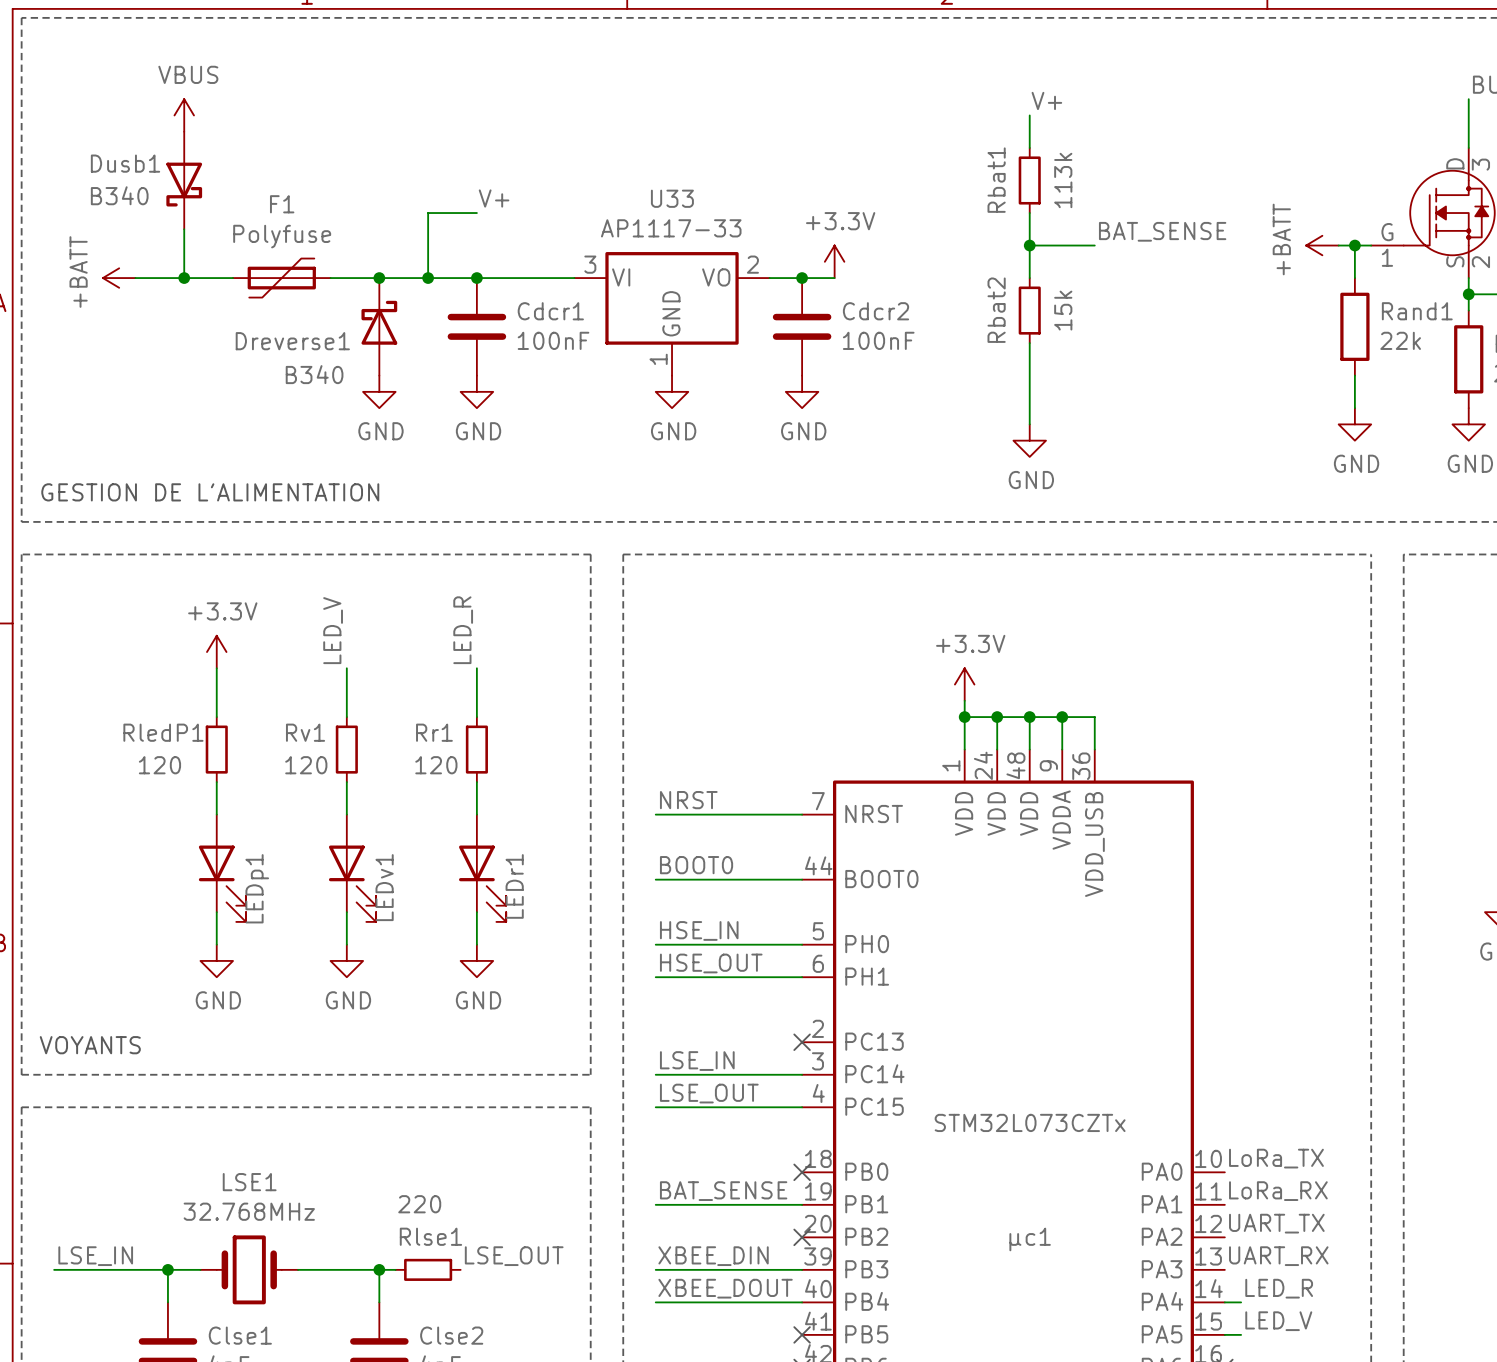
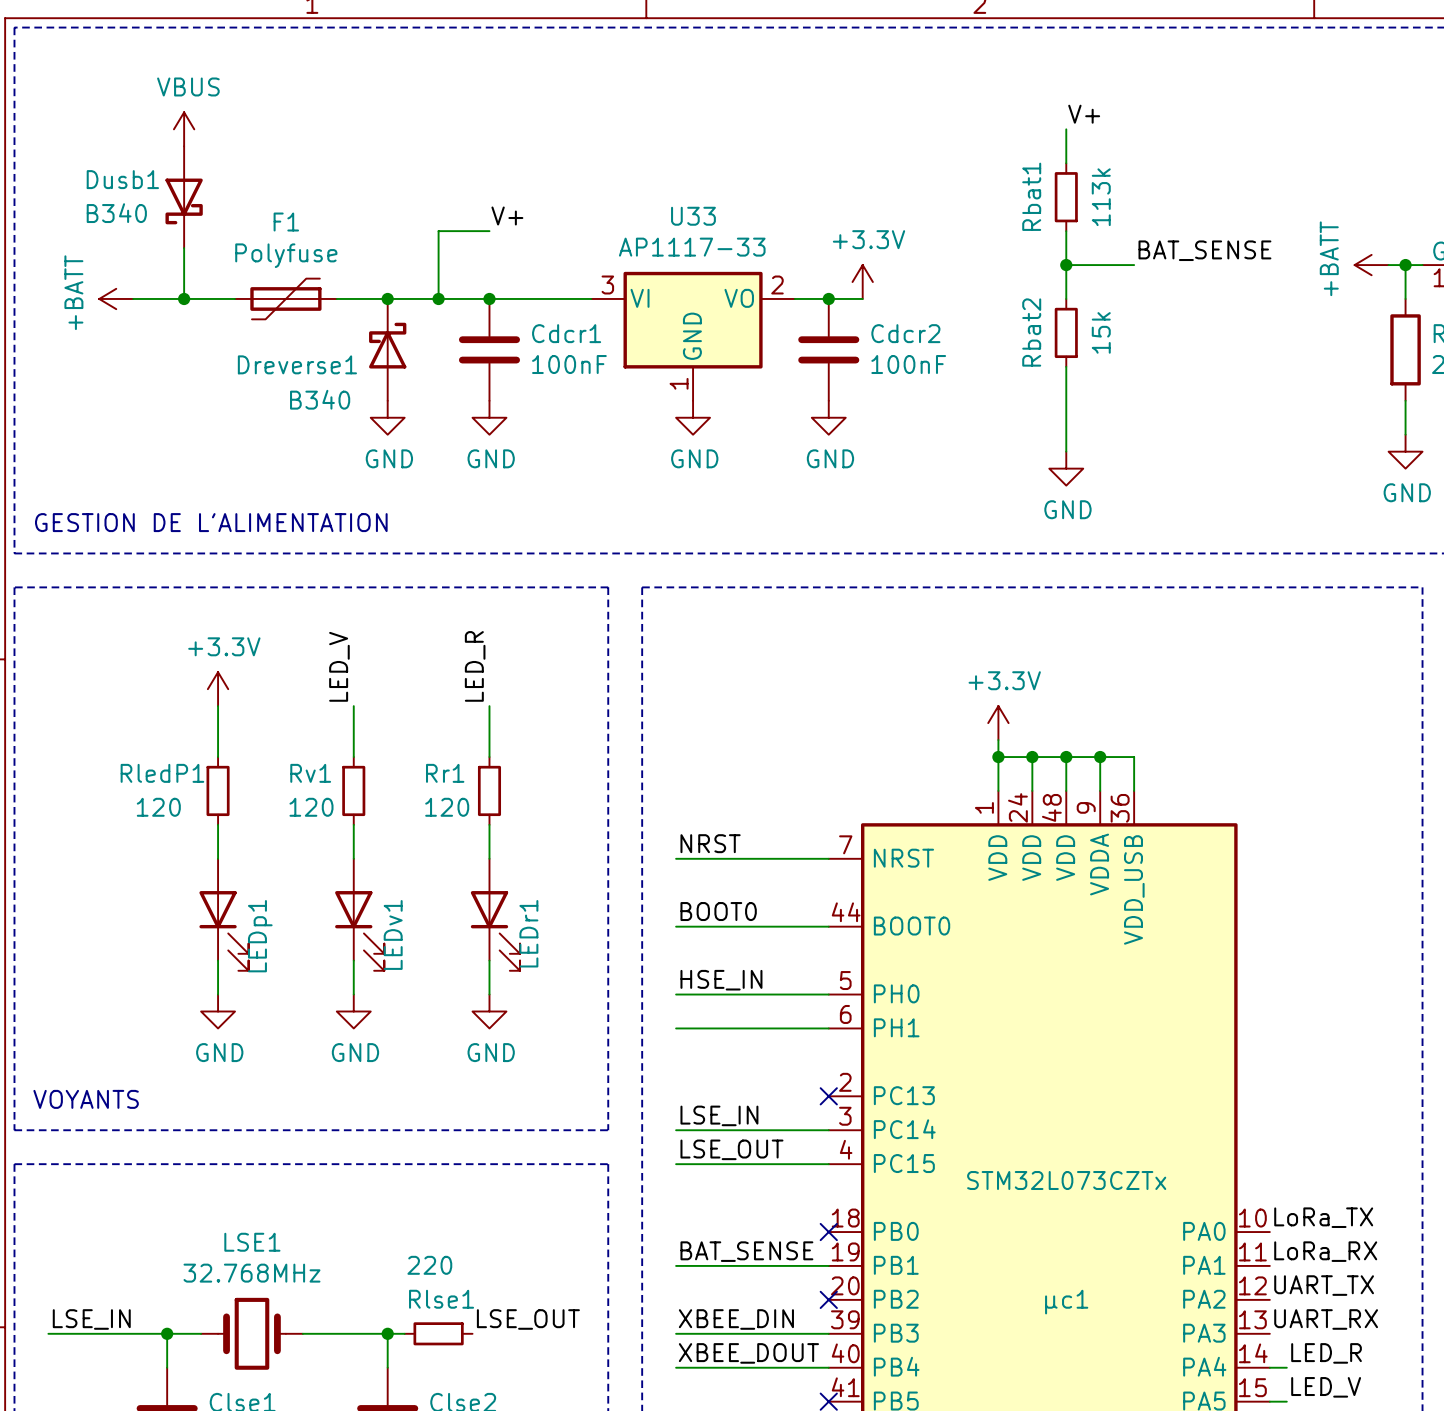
label: HSE_OUT (711, 963) -> none

